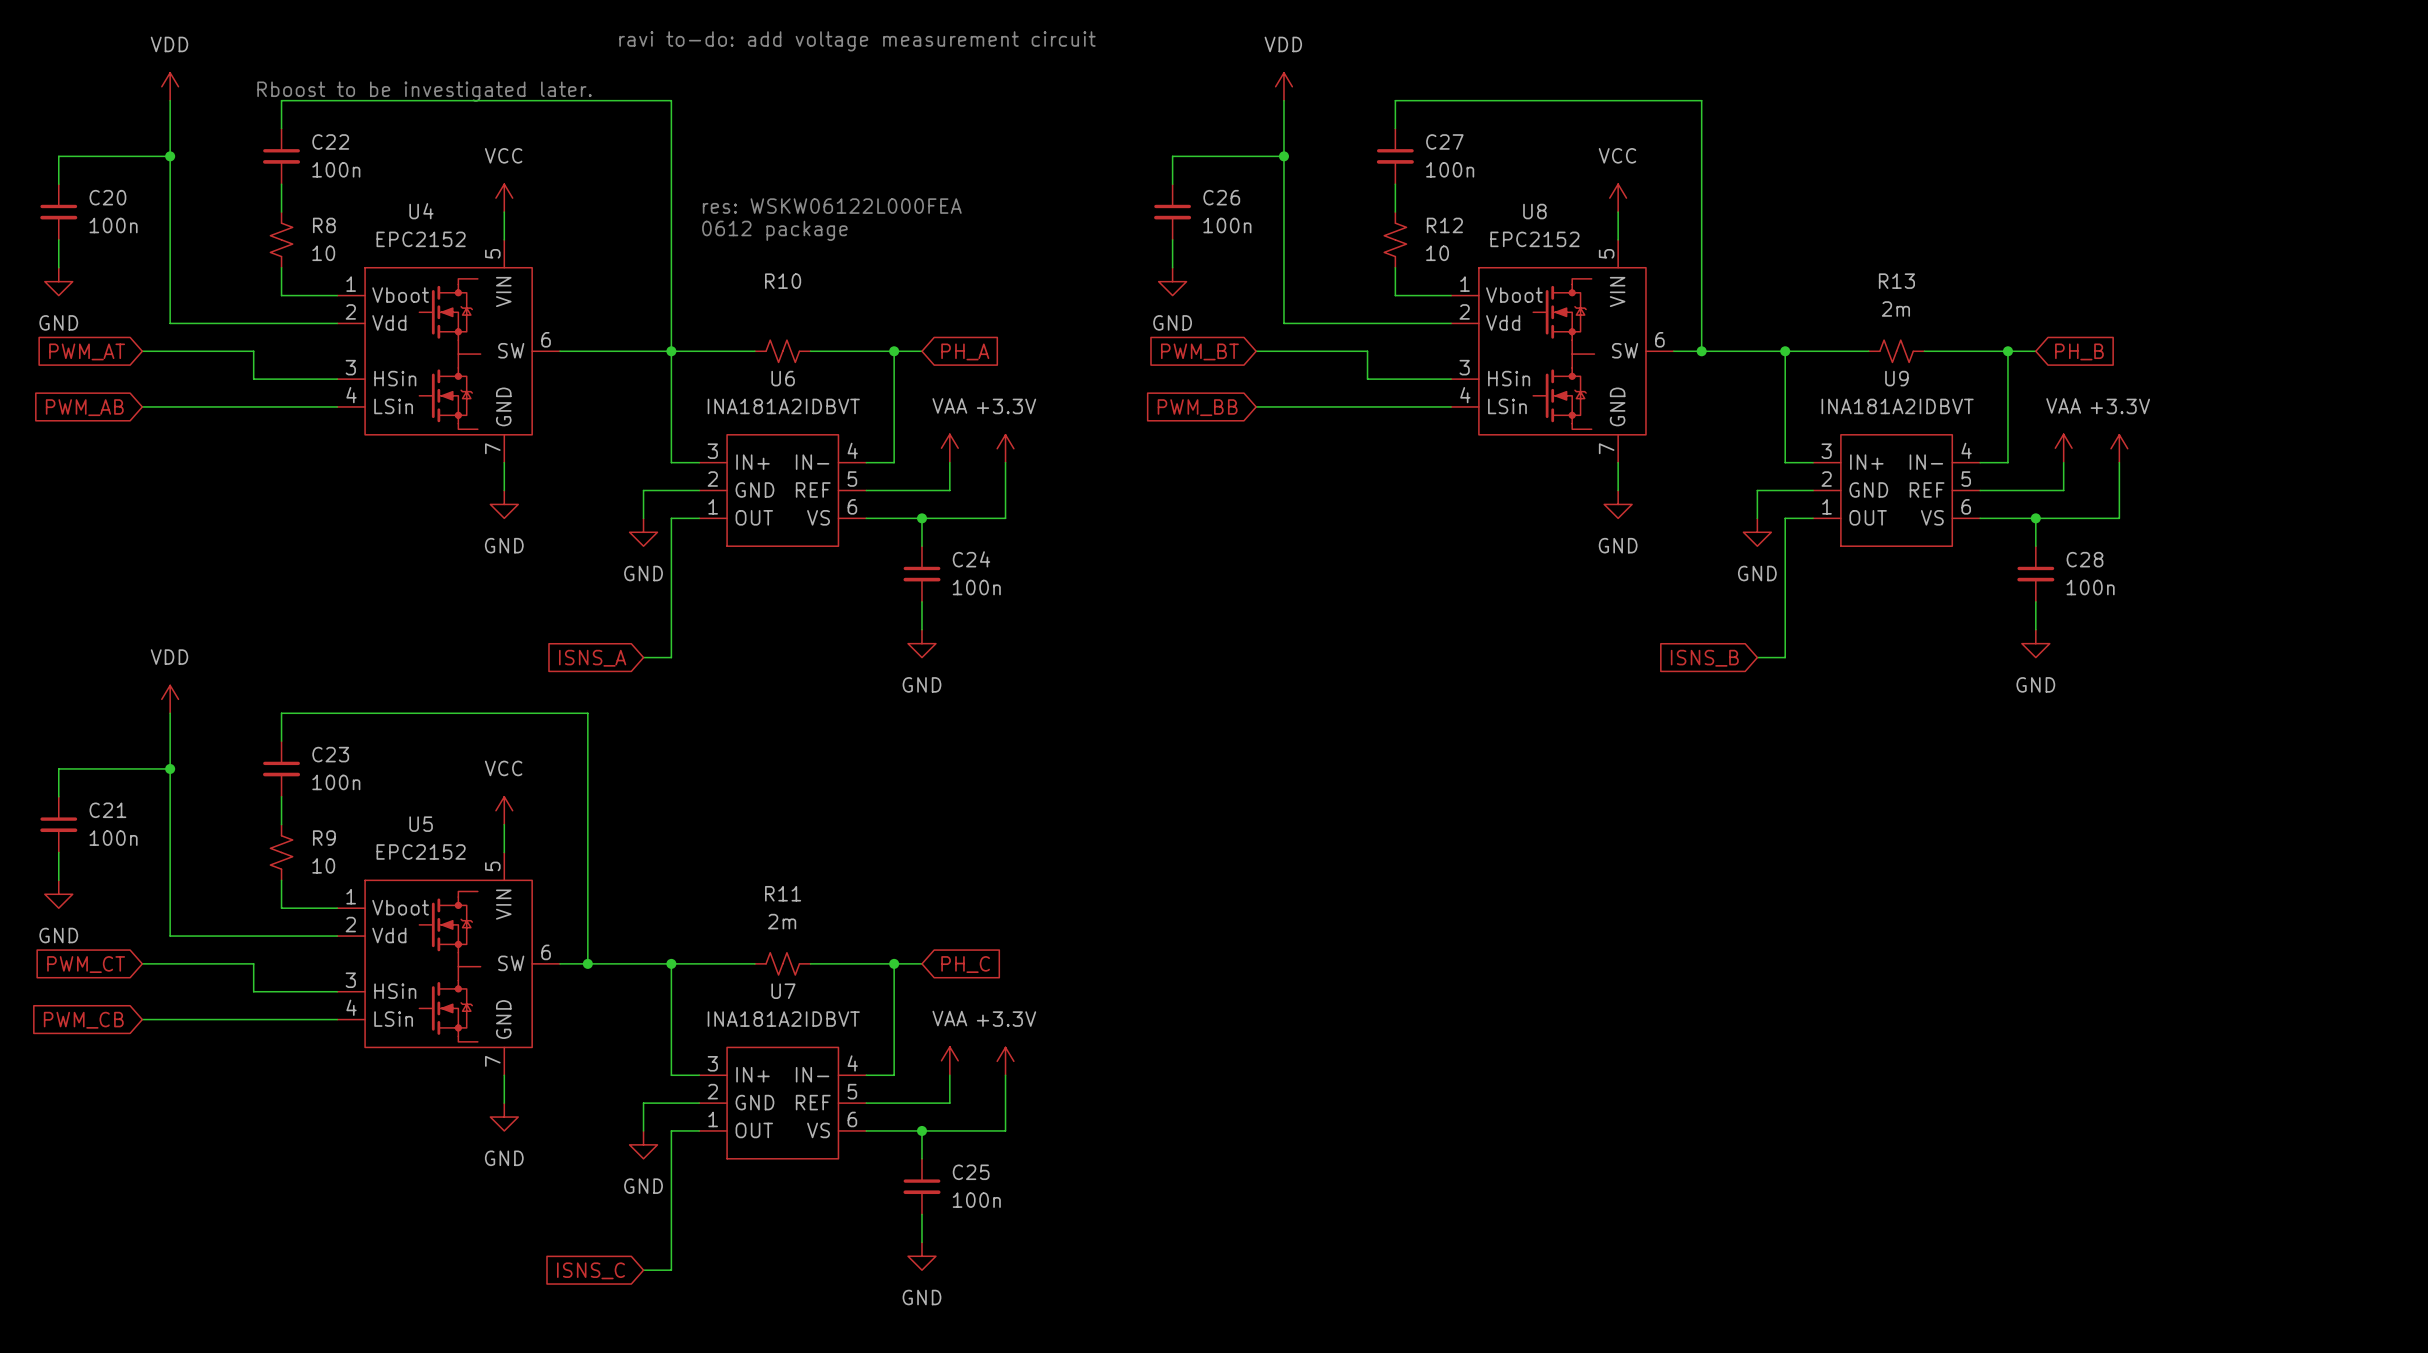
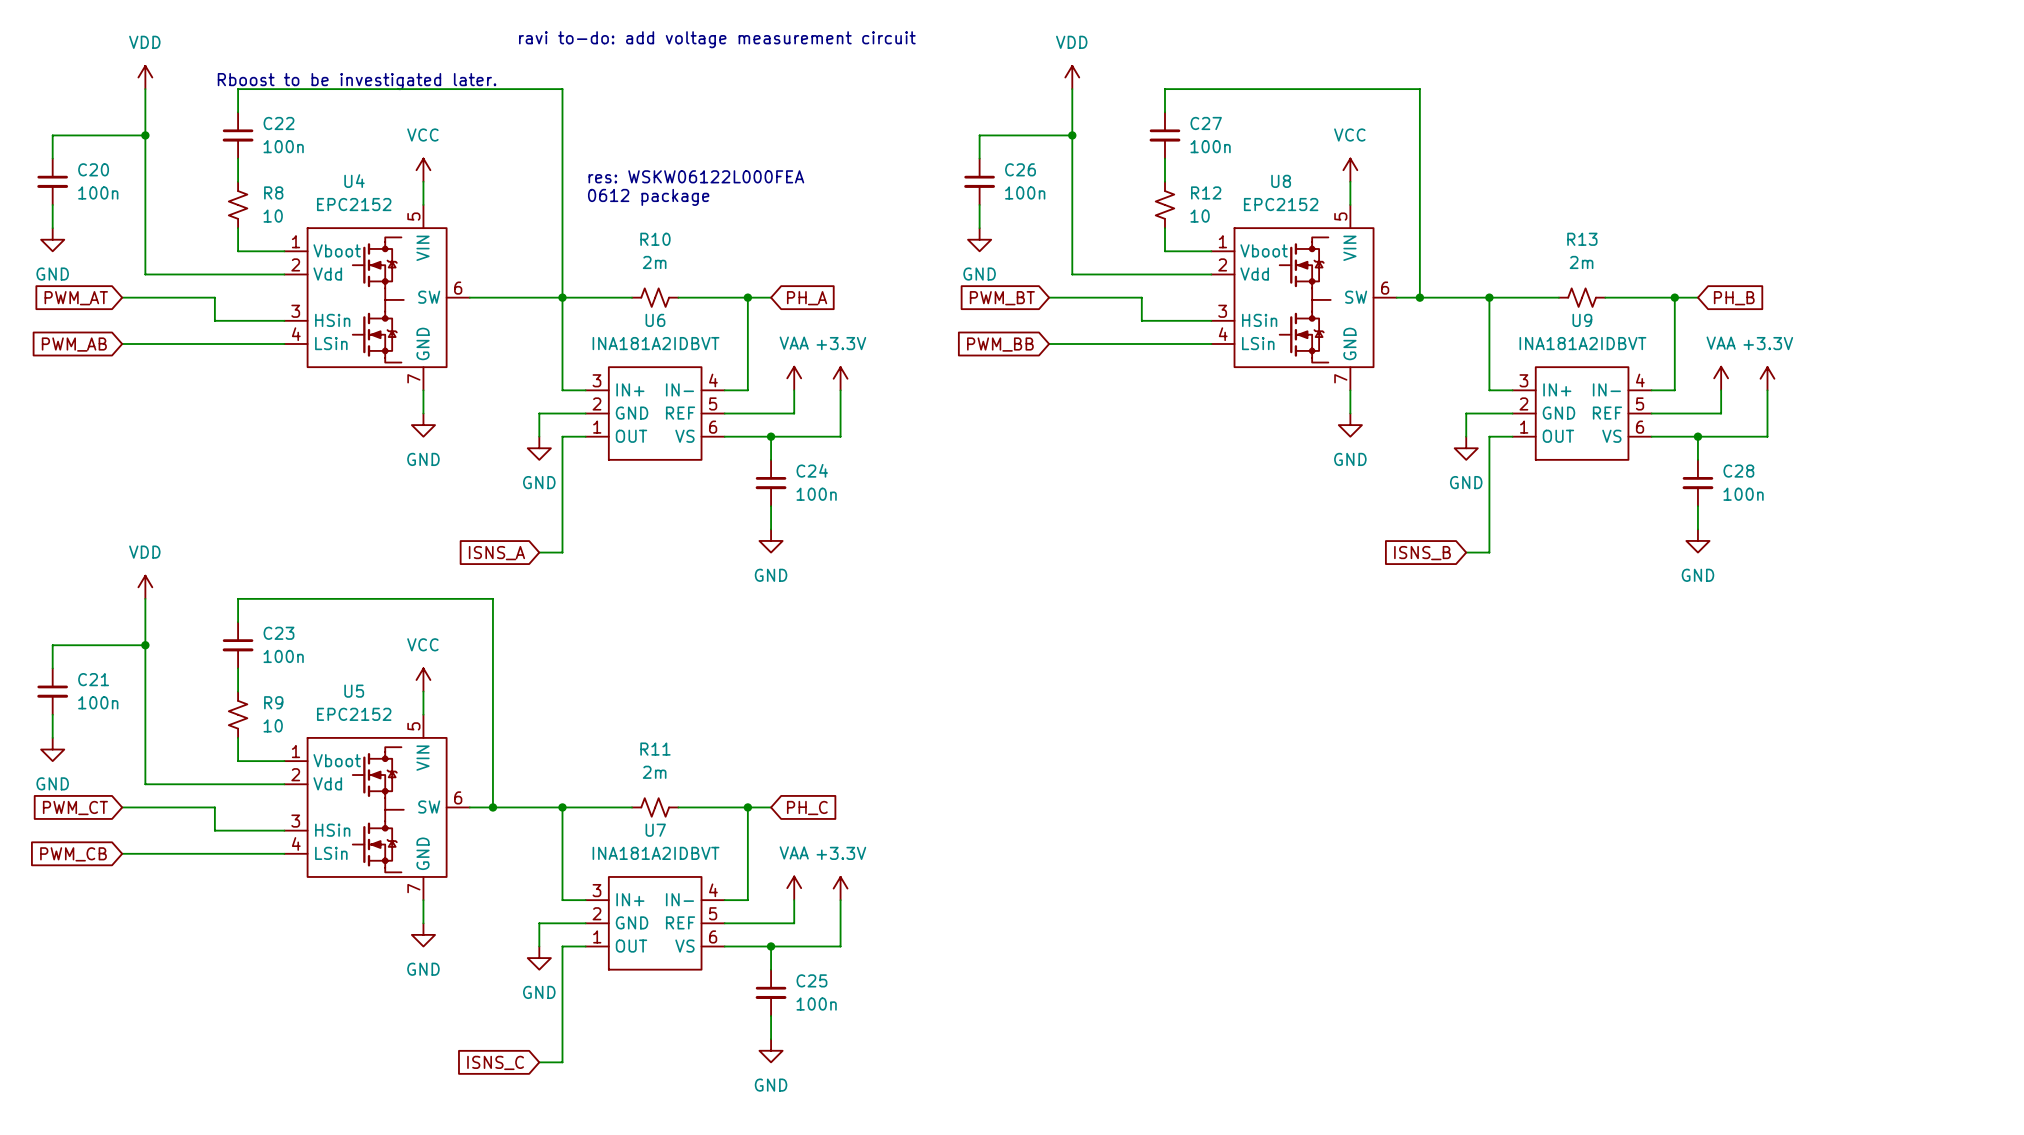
R10 value: none -> 2m (654, 262)

